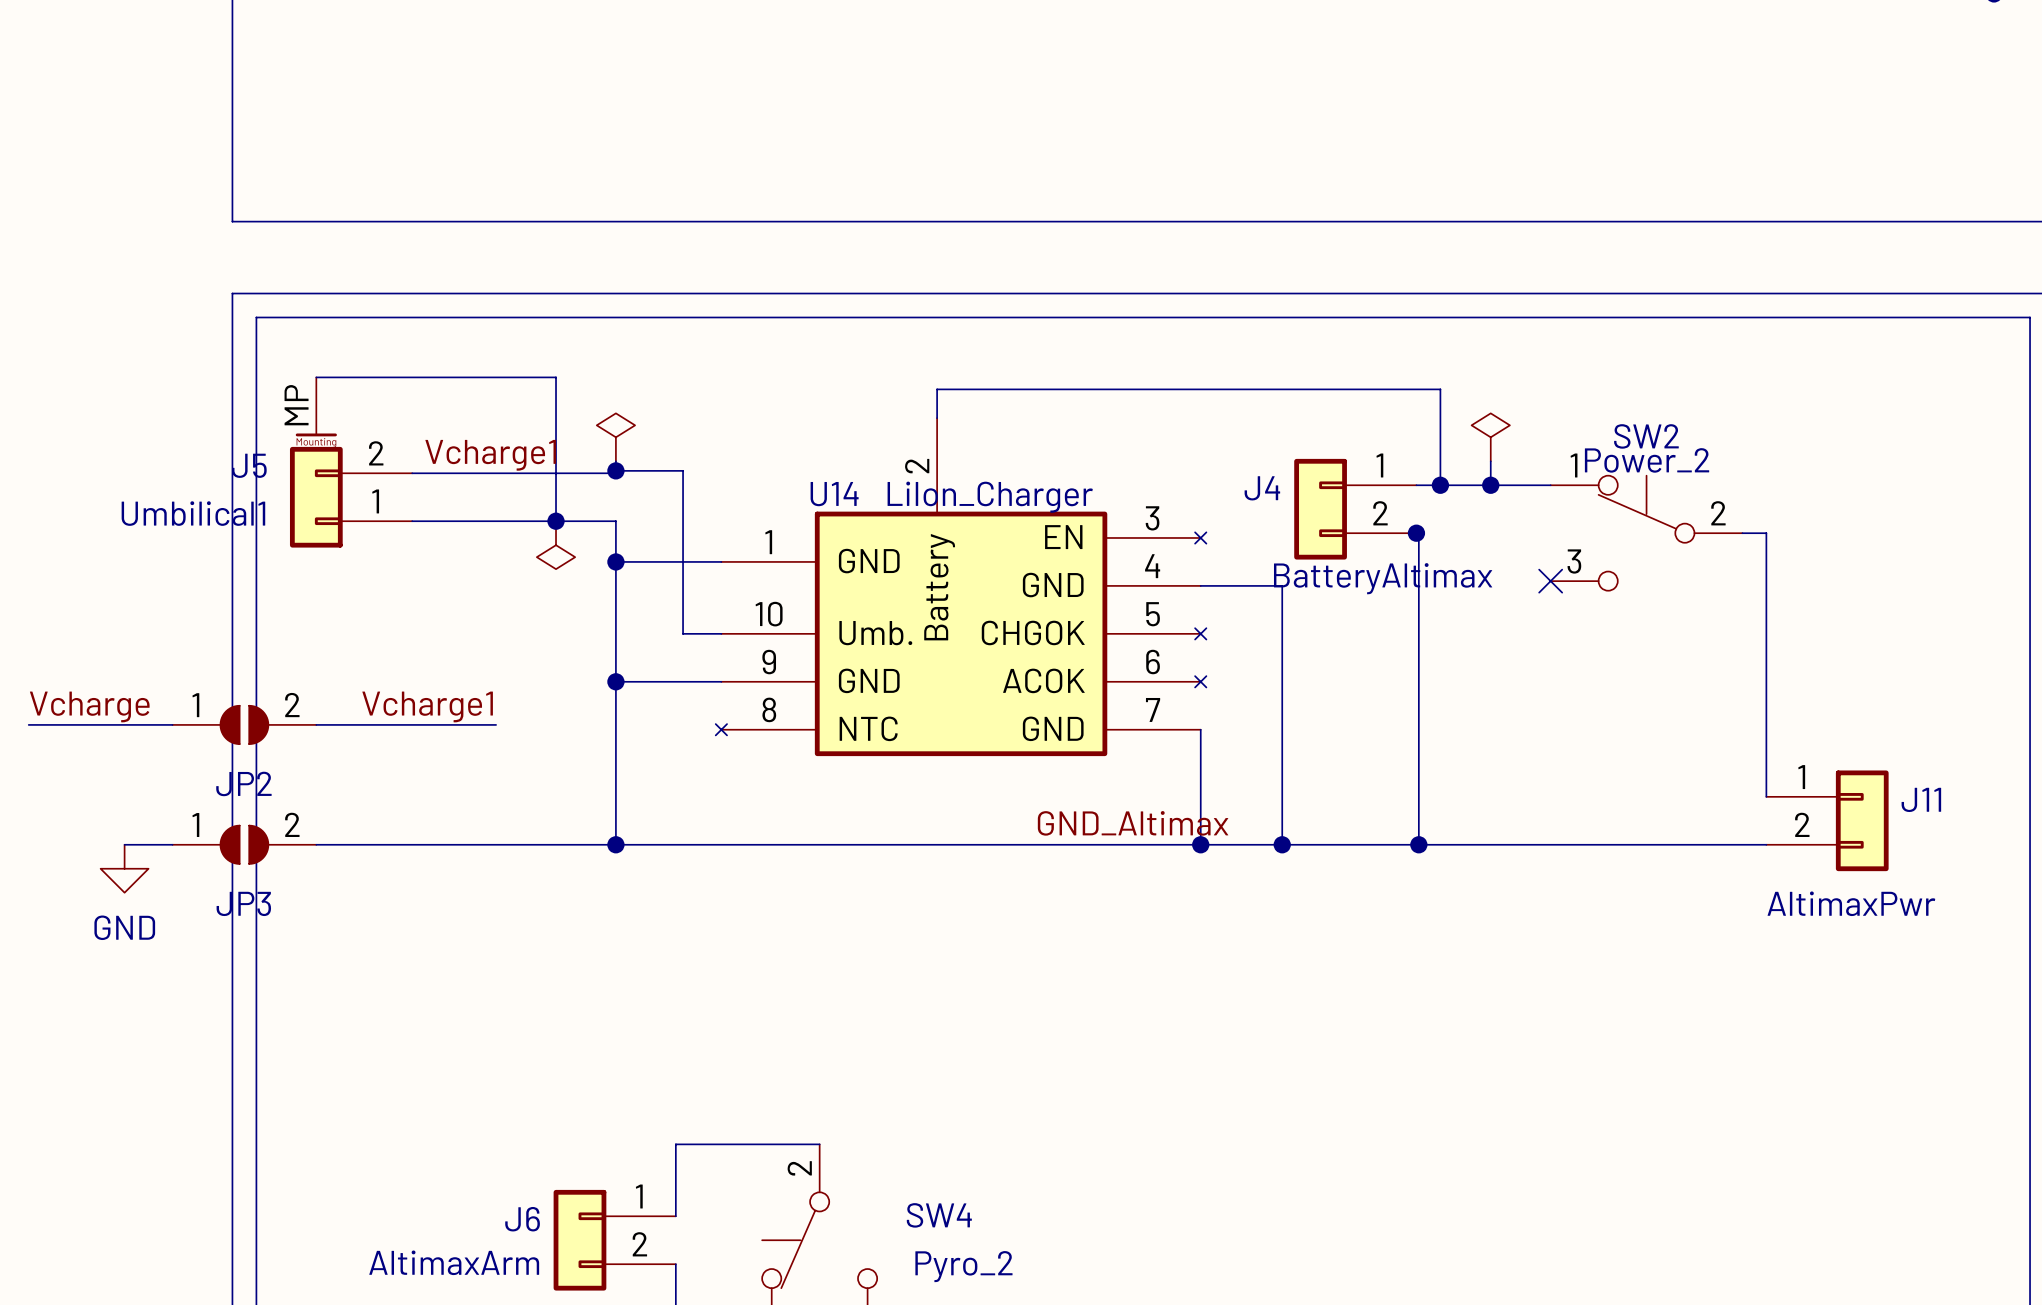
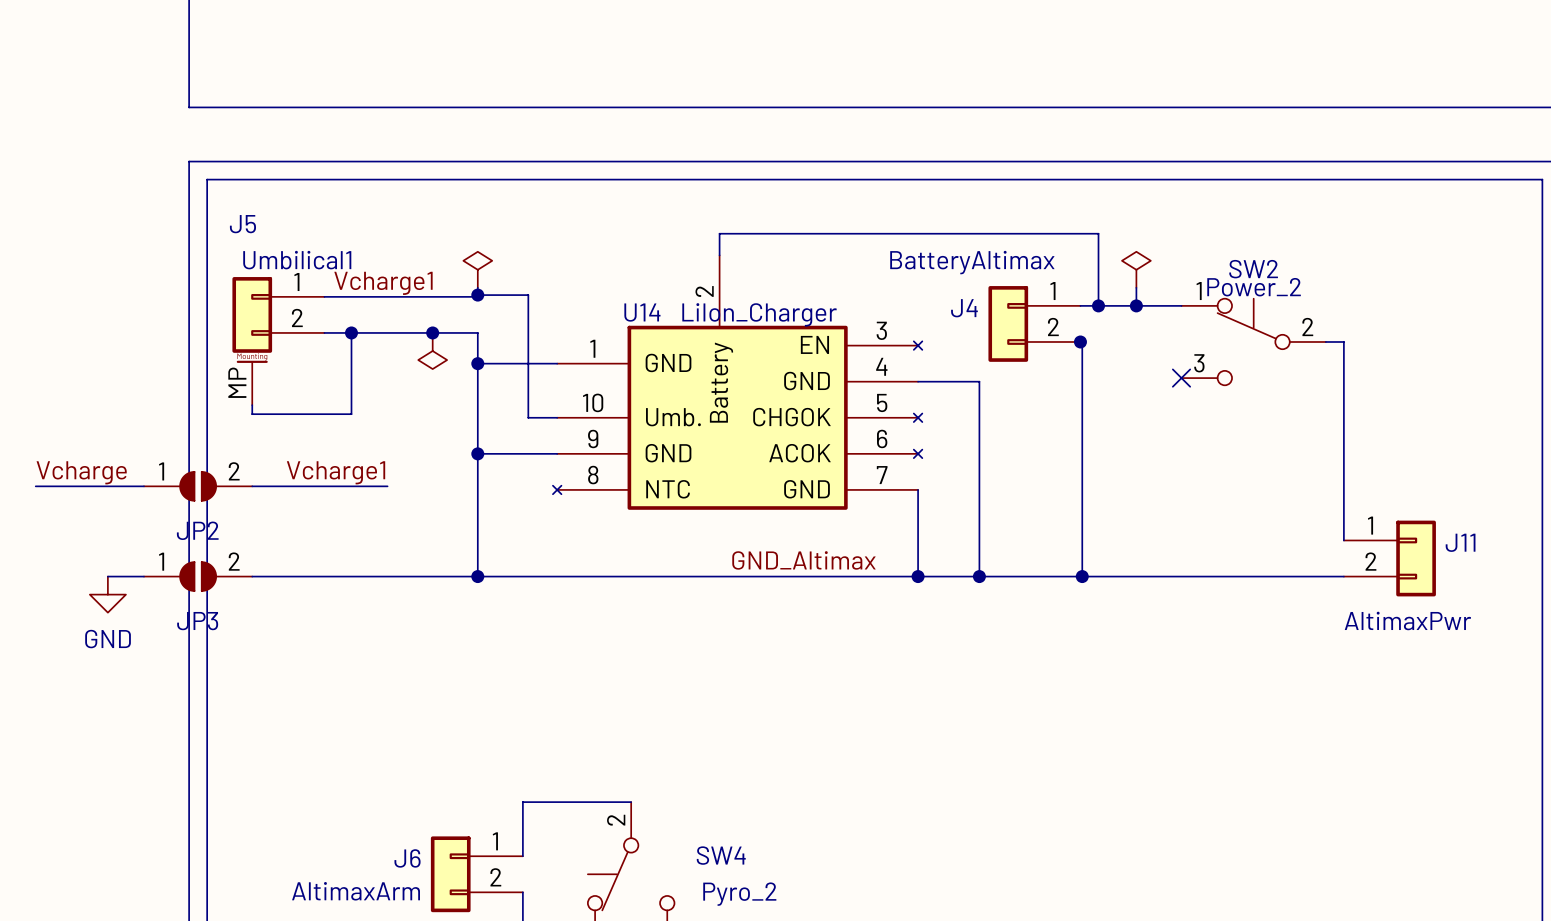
wire: (316, 377) (556, 377) (556, 521) -> none
J5 name position: J5 (249, 465) -> J5 (242, 224)
J5 flip: as is (316, 490) -> up-down (252, 319)
J5 value position: Umbilical1 (193, 513) -> Umbilical1 (297, 260)
wire: none -> (351, 332) (351, 414) (252, 414) (252, 405)
junction: none -> (351, 332)
J4 value position: BatteryAltimax (1383, 578) -> BatteryAltimax (972, 262)
label position: GND_Altimax (1133, 823) -> GND_Altimax (803, 560)

